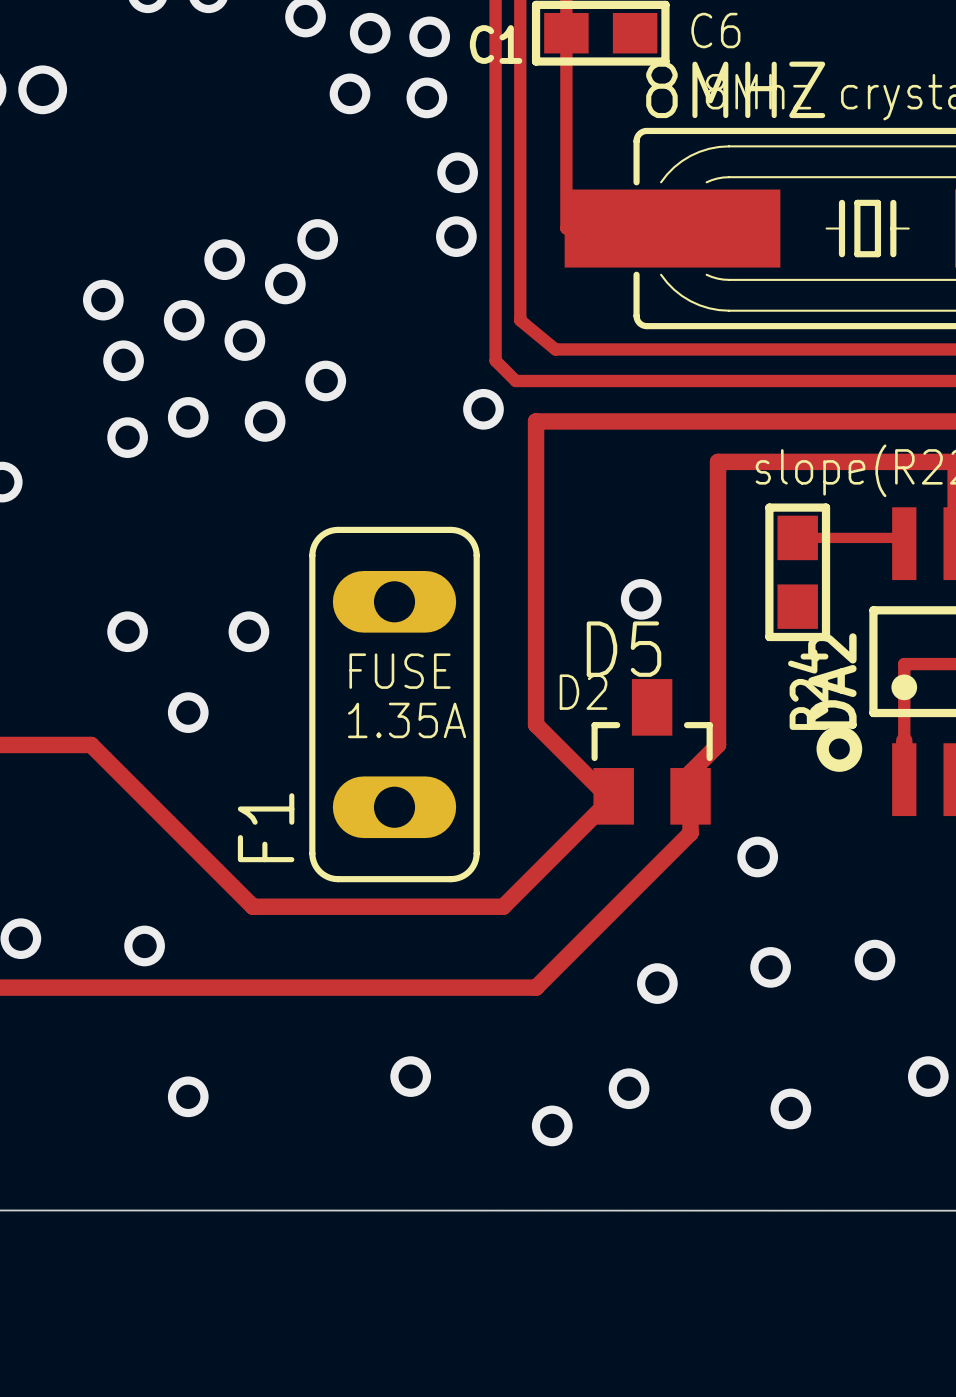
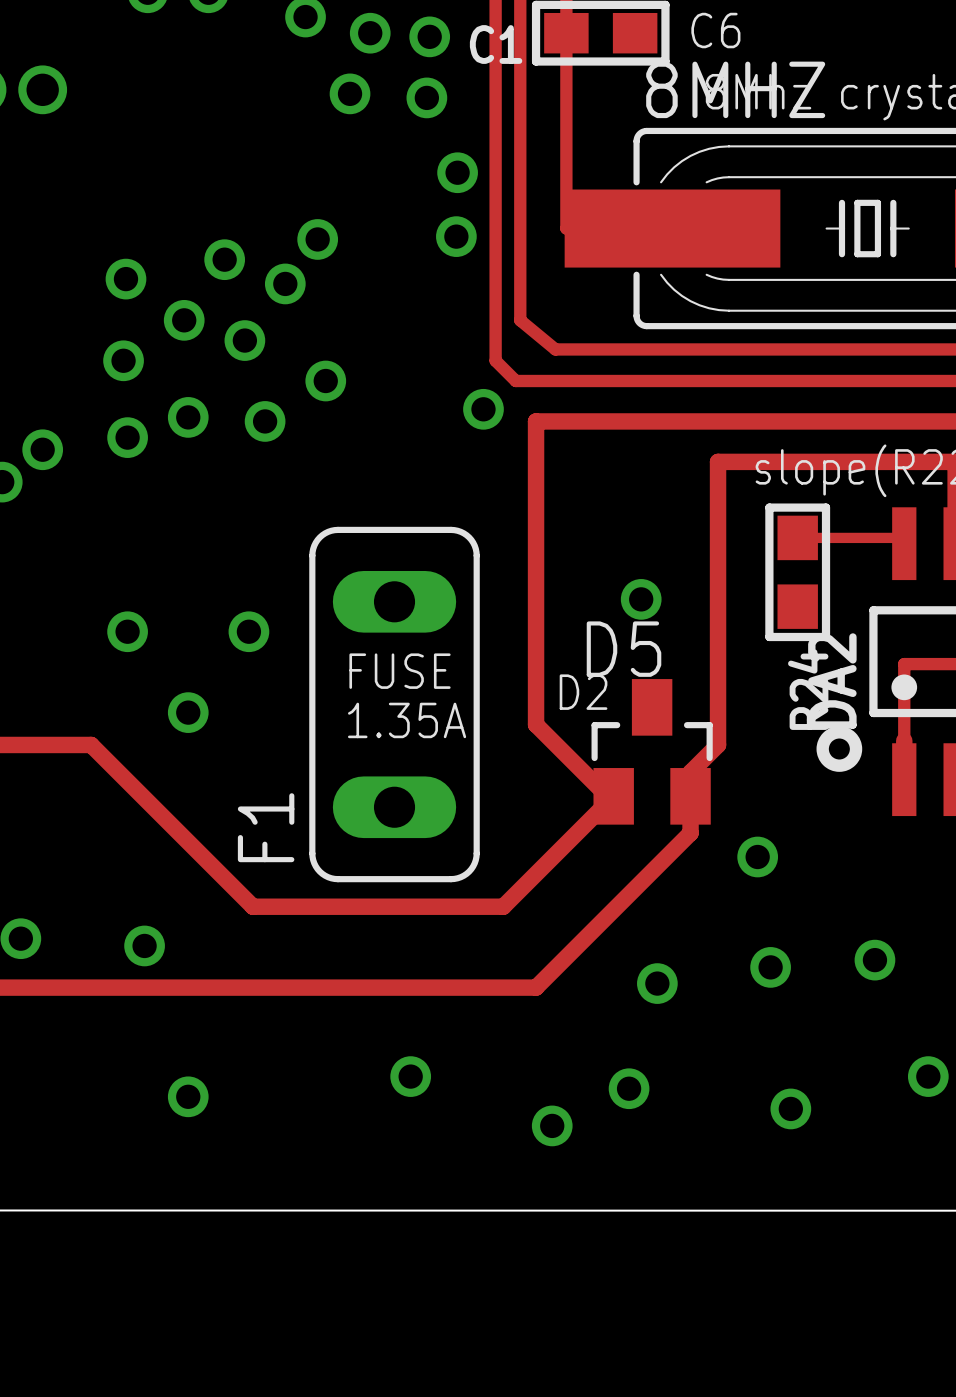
via position: (103, 300) -> (125, 279)
via: none -> (42, 449)

